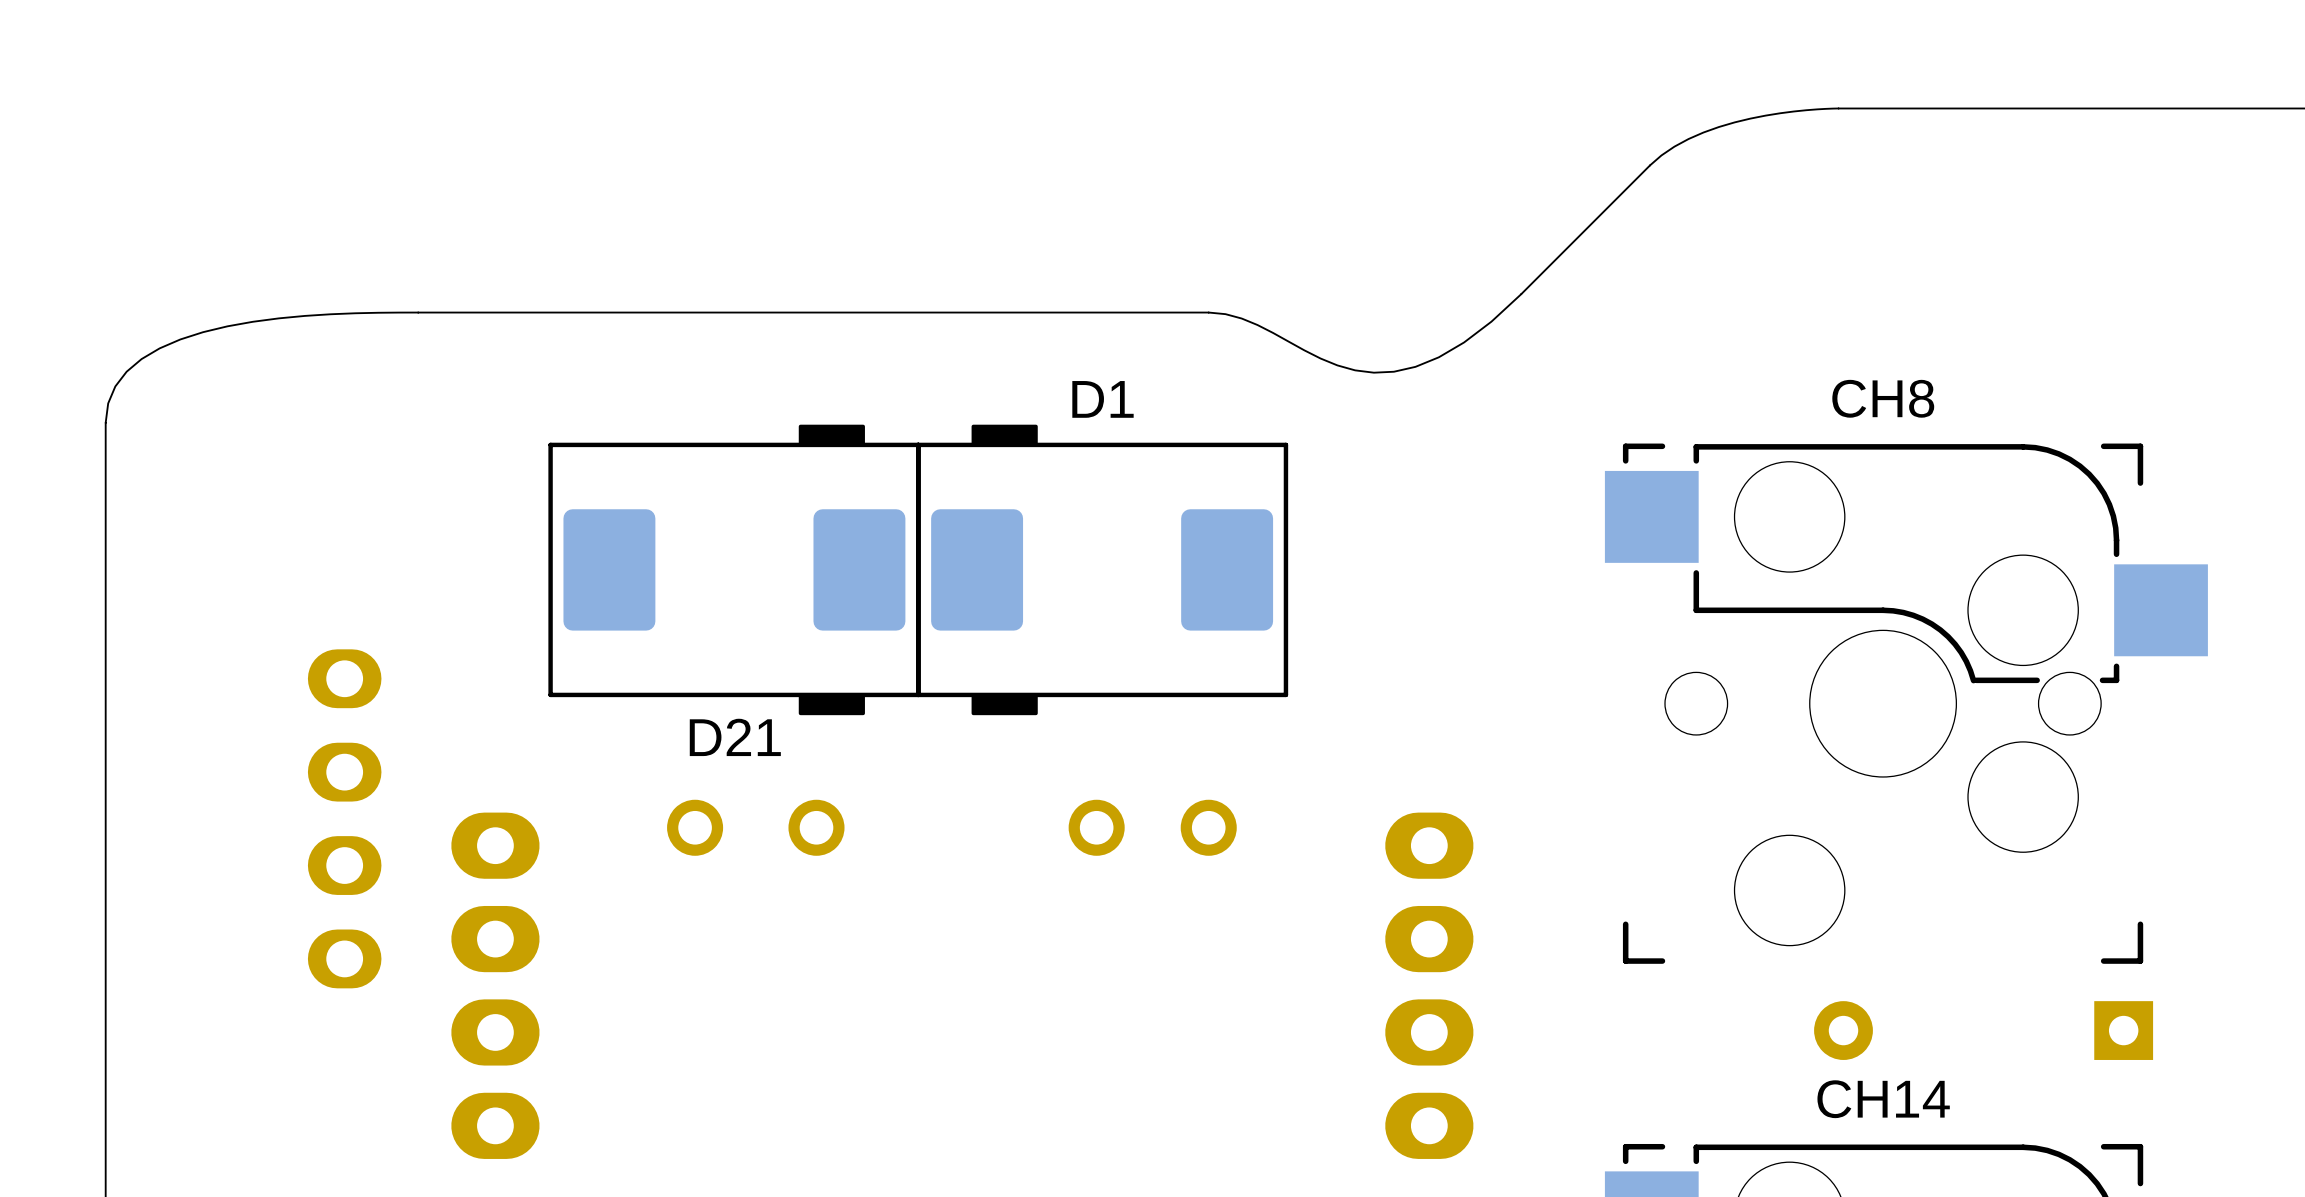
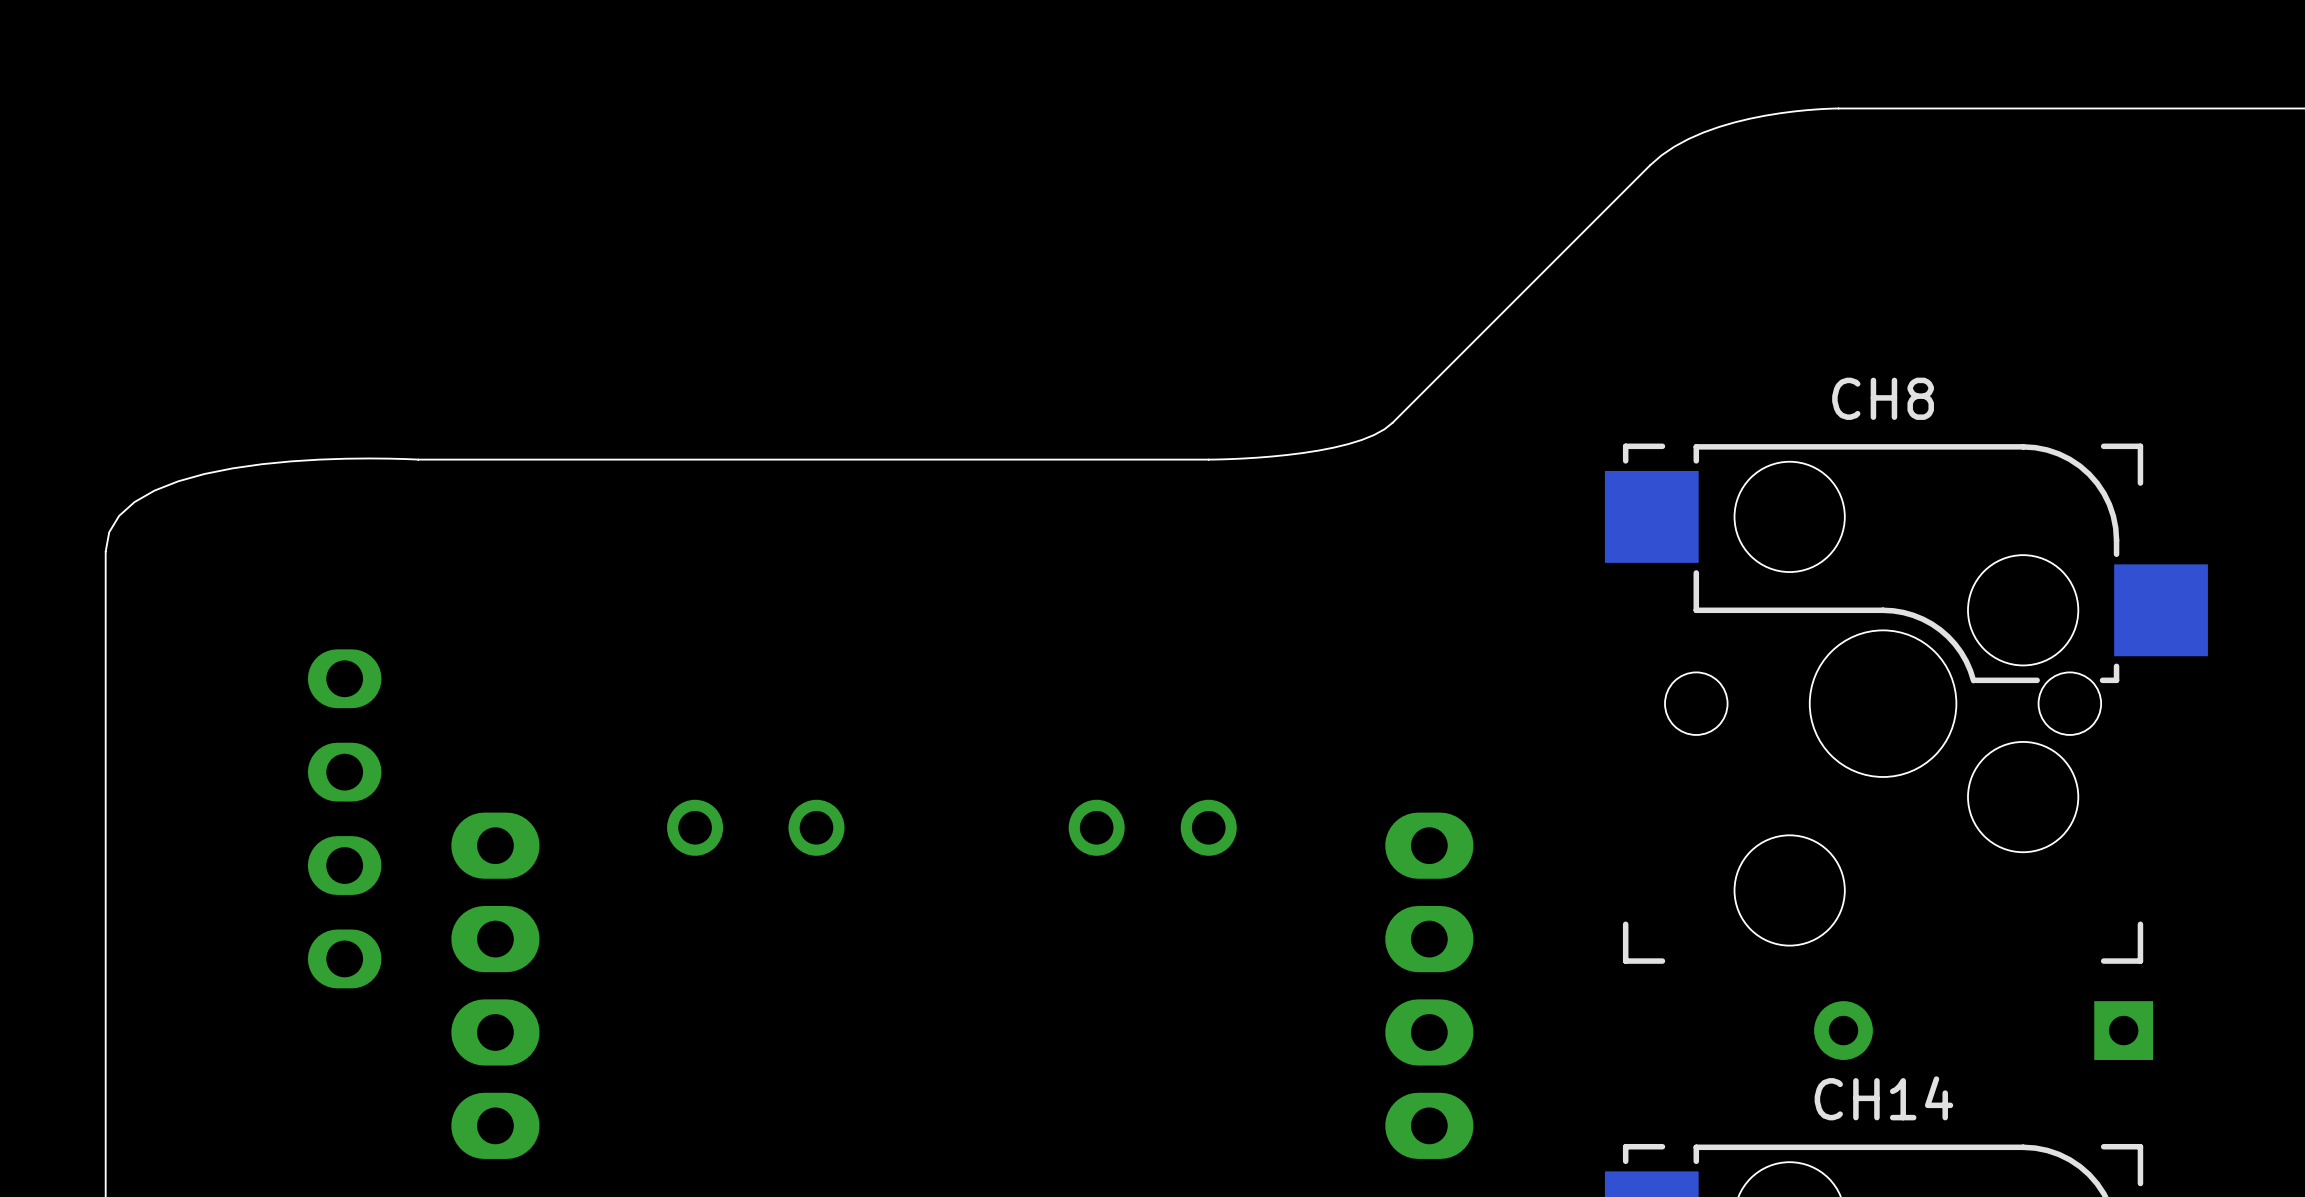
board edge: (1521, 294) (1491, 321) (1464, 342) (1438, 357) (1415, 366) (1393, 371) (1373, 372) (1355, 370) (1320, 358) (1241, 318) (1208, 312) (378, 312) (305, 315) (227, 326) (180, 339) (159, 348) (141, 359) (126, 371) (115, 386) (108, 403) (105, 422) (105, 551) -> (1521, 294) (1384, 429) (1361, 439) (1318, 450) (1271, 456) (1210, 459) (369, 458) (291, 461) (232, 468) (204, 473) (154, 490) (134, 502) (119, 515) (109, 532) (105, 551)
D21: (734, 569) -> none
D1: (1102, 569) -> none

